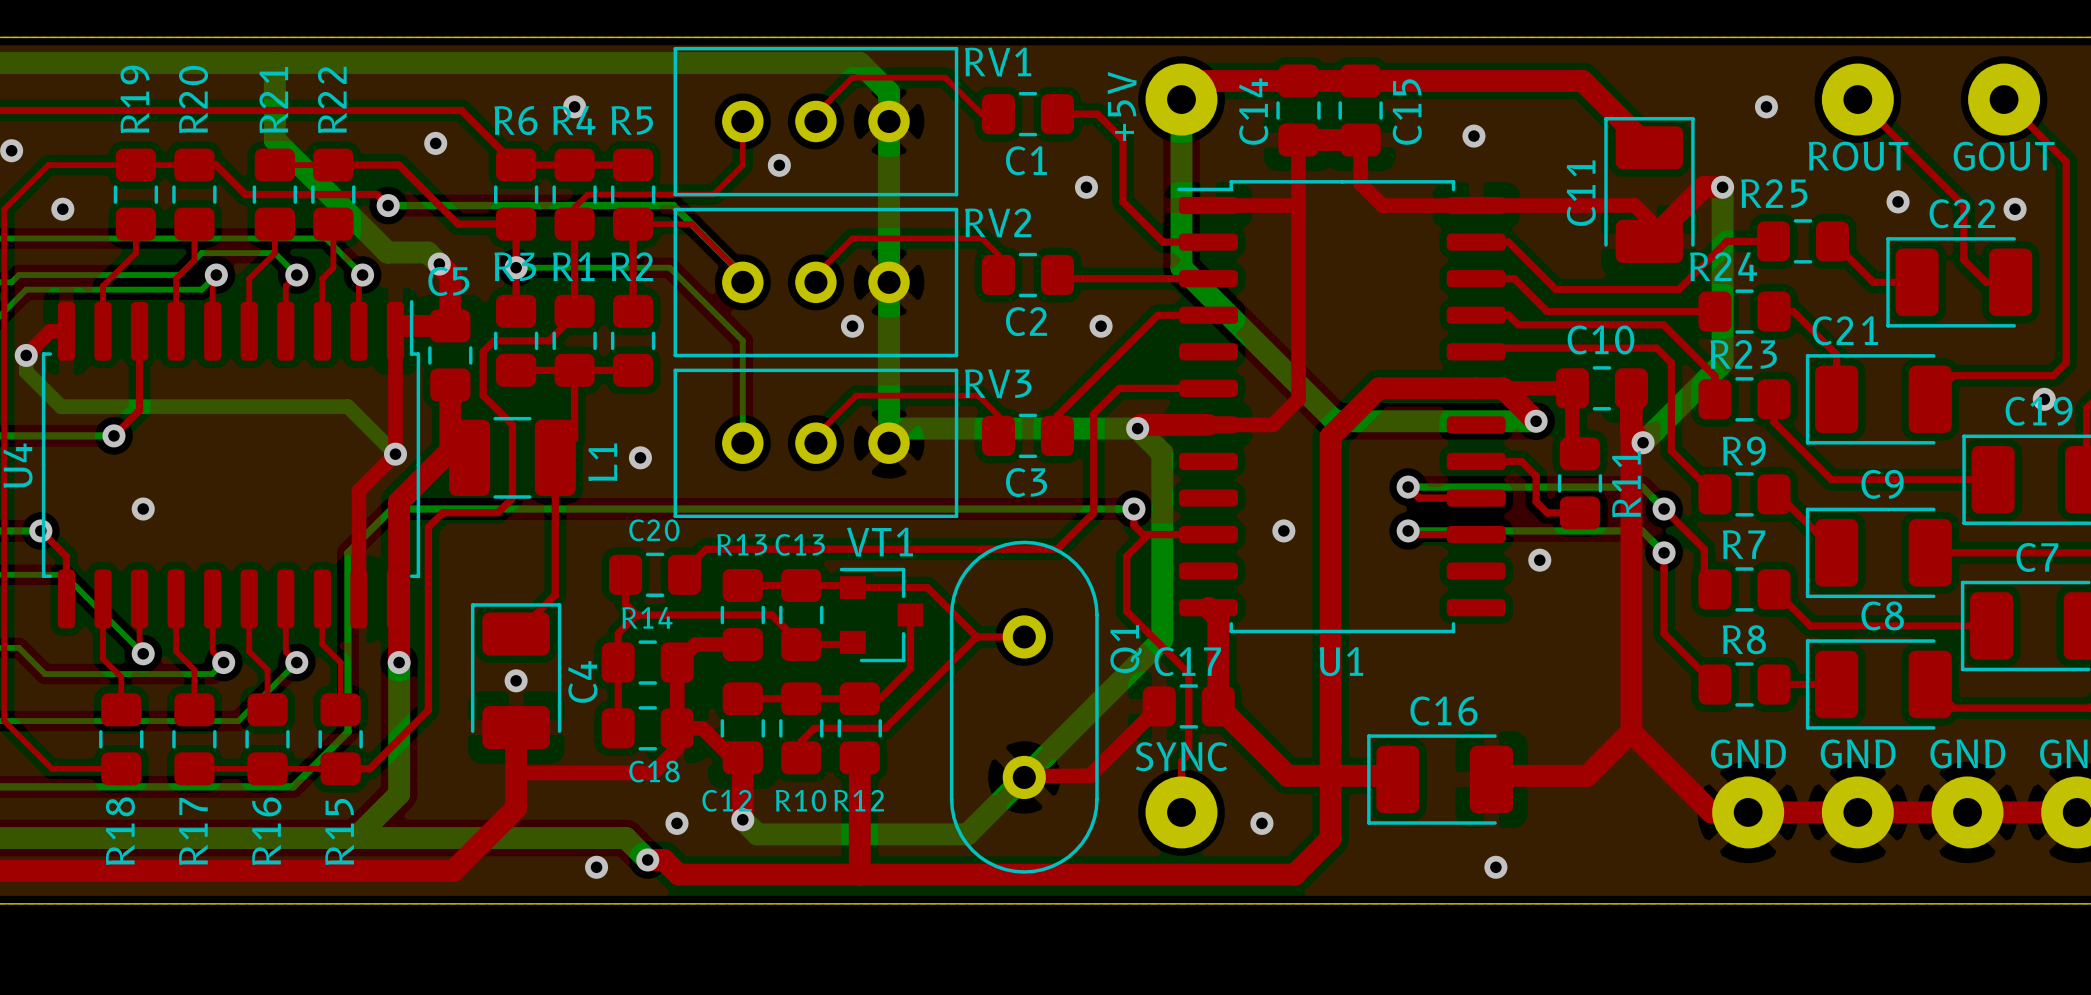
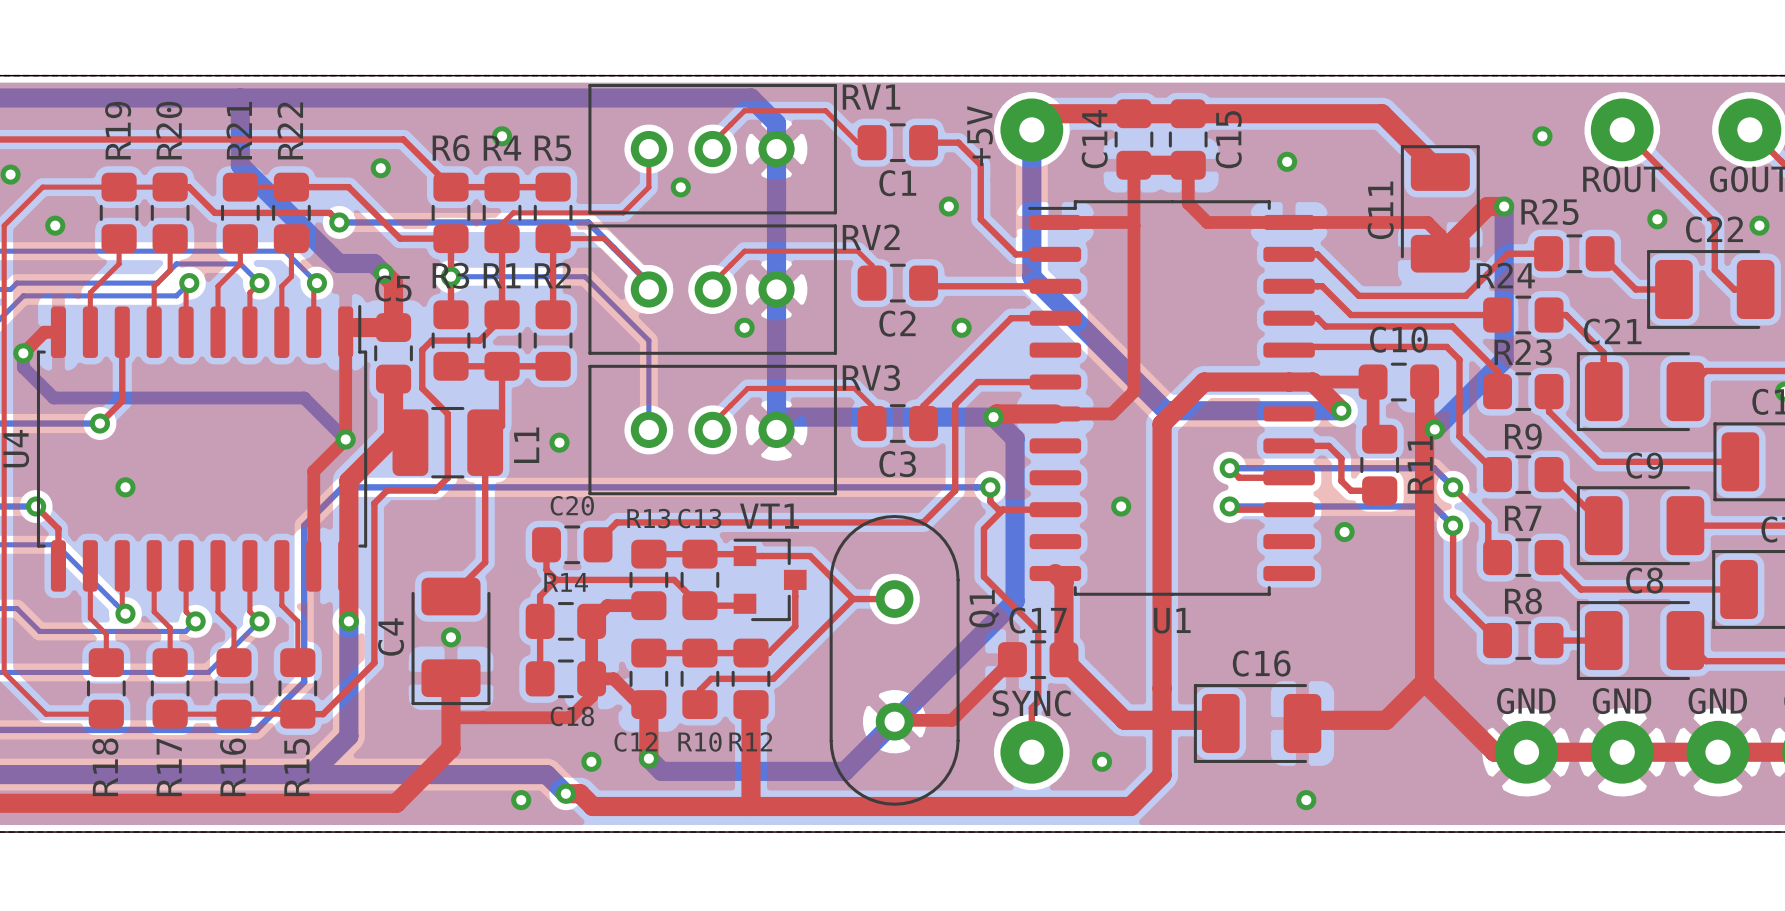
C4 rotation: 0° (516, 676) -> 180° (450, 641)

